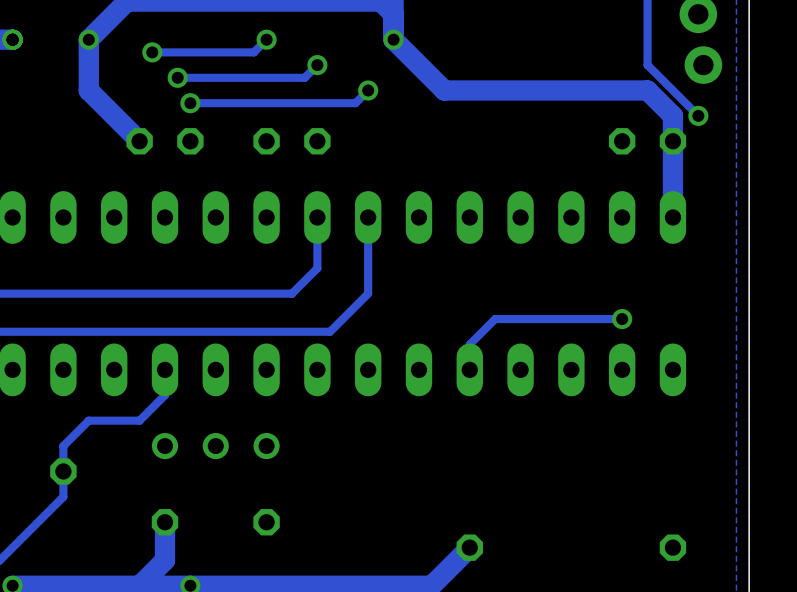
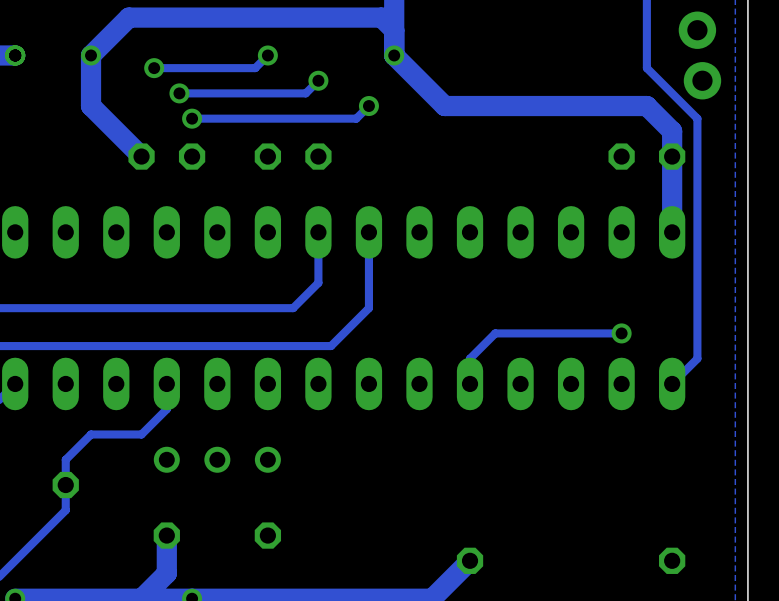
track: (647, 52) (647, 65) (698, 115) -> (646, 68) (697, 118) (697, 358) (672, 383)
via: (698, 115) -> none

